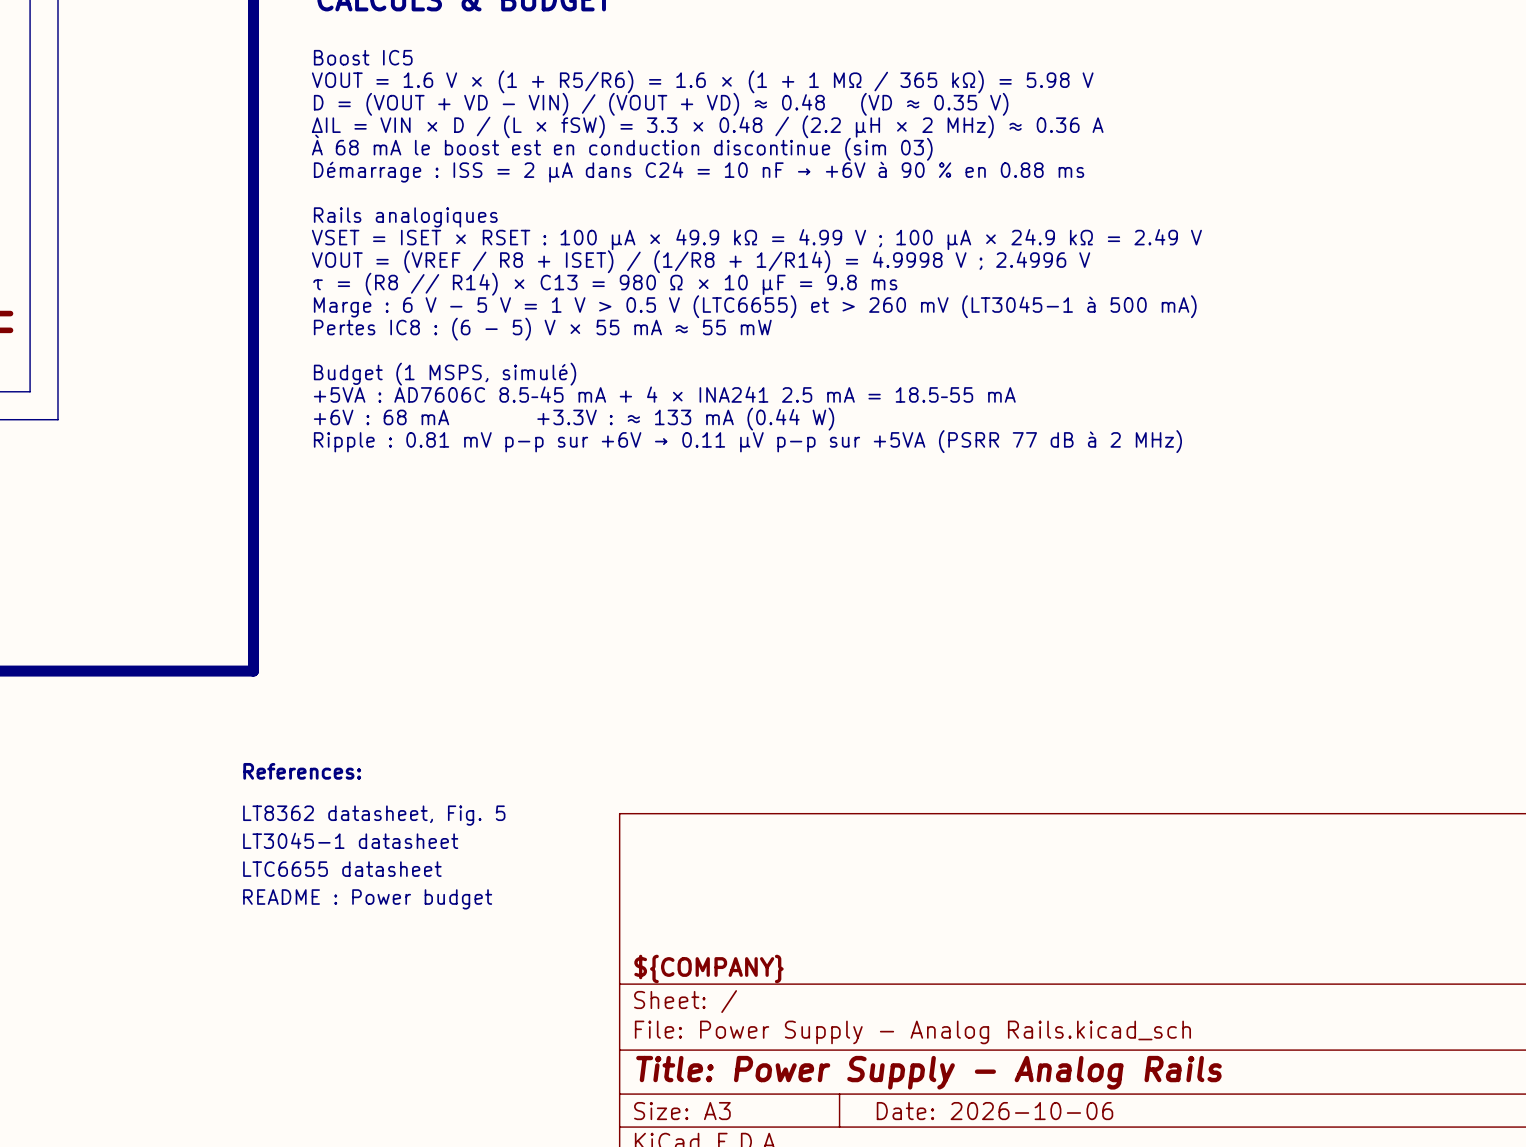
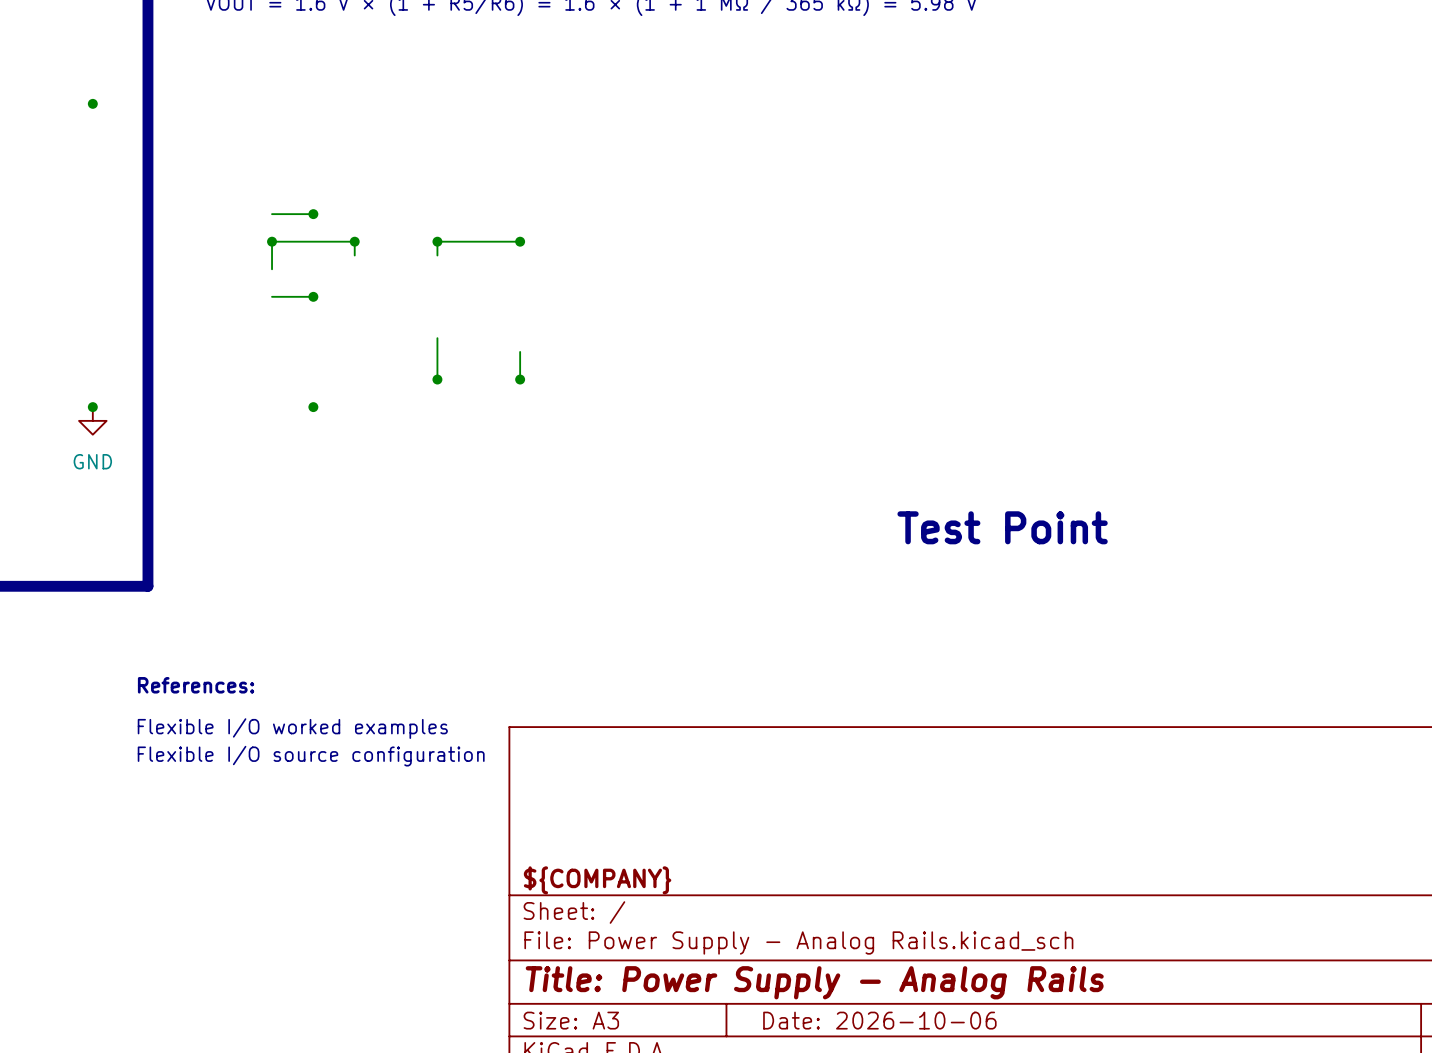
text: D = (VOUT + VD − VIN) / (VOUT + VD) ≈ 0.48 (VD ≈ 0.35 V) (661, 104) -> none
text: ΔIL = VIN × D / (L × fSW) = 3.3 × 0.48 / (2.2 µH × 2 MHz) ≈ 0.36 A (707, 126) -> none
text: À 68 mA le boost est en conduction discontinue (sim 03) (622, 147) -> none
text: Démarrage : ISS = 2 µA dans C24 = 10 nF → +6V à 90 % en 0.88 ms (699, 172) -> none
junction: none -> (92, 103)
text: Rails analogiques (405, 217) -> none
text: VSET = ISET × RSET : 100 µA × 49.9 kΩ = 4.99 V ; 100 µA × 24.9 kΩ = 2.49 V (756, 239) -> none
text: VOUT = (VREF / R8 + ISET) / (1/R8 + 1/R14) = 4.9998 V ; 2.4996 V (701, 261) -> none
text: τ = (R8 // R14) × C13 = 980 Ω × 10 µF = 9.8 ms (605, 284) -> none
wire: none -> (272, 214) (313, 214)
junction: none -> (313, 214)
text: Marge : 6 V − 5 V = 1 V > 0.5 V (LTC6655) et > 260 mV (LT3045-1 à 500 mA) (755, 306) -> none
junction: none -> (272, 241)
junction: none -> (354, 241)
junction: none -> (437, 241)
wire: none -> (520, 241) (437, 241) (437, 255)
junction: none -> (520, 241)
text: Pertes IC8 : (6 − 5) V × 55 mA ≈ 55 mW (542, 329) -> none
wire: none -> (354, 255) (354, 241) (272, 241) (272, 269)
text: Budget (1 MSPS, simulé) (445, 374) -> none
wire: none -> (272, 296) (313, 296)
junction: none -> (313, 296)
text: +5VA : AD7606C 8.5–45 mA + 4 × INA241 2.5 mA = 18.5–55 mA (664, 394) -> none
wire: none -> (437, 338) (437, 379)
text: +6V : 68 mA +3.3V : ≈ 133 mA (0.44 W) (574, 419) -> none
wire: none -> (520, 351) (520, 379)
text: Ripple : 0.81 mV p-p sur +6V → 0.11 µV p-p sur +5VA (PSRR 77 dB à 2 MHz) (747, 441) -> none
junction: none -> (437, 379)
junction: none -> (520, 379)
junction: none -> (92, 407)
junction: none -> (313, 407)
power symbol: none -> GND (92, 420)
text: none -> Test Point (1002, 527)
text: LT8362 datasheet, Fig. 5 (374, 815) -> Flexible I/O worked examples (292, 728)
text: LT3045-1 datasheet (350, 840) -> Flexible I/O source configuration (311, 756)
text: LTC6655 datasheet (342, 869) -> none
text: README : Power budget (367, 899) -> none

